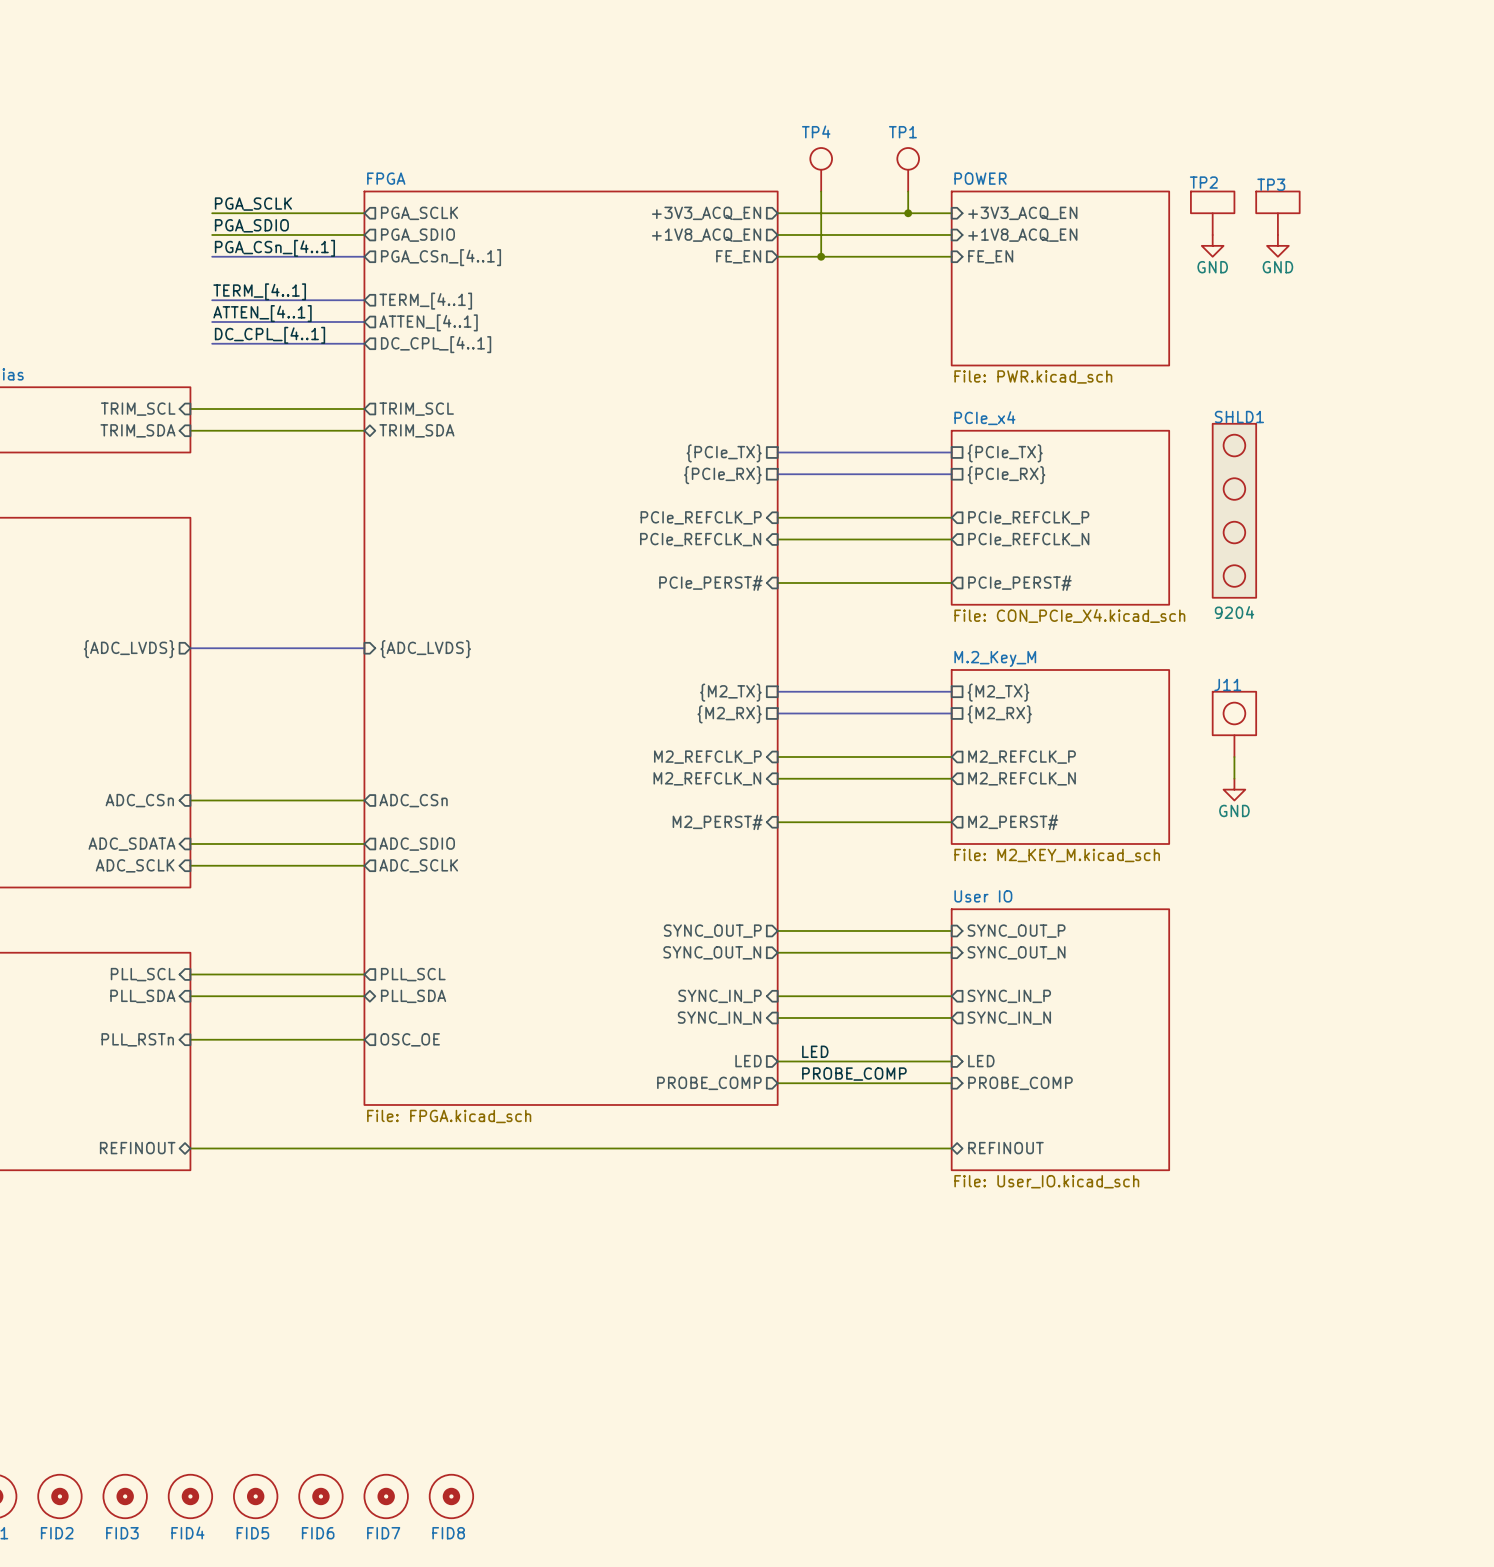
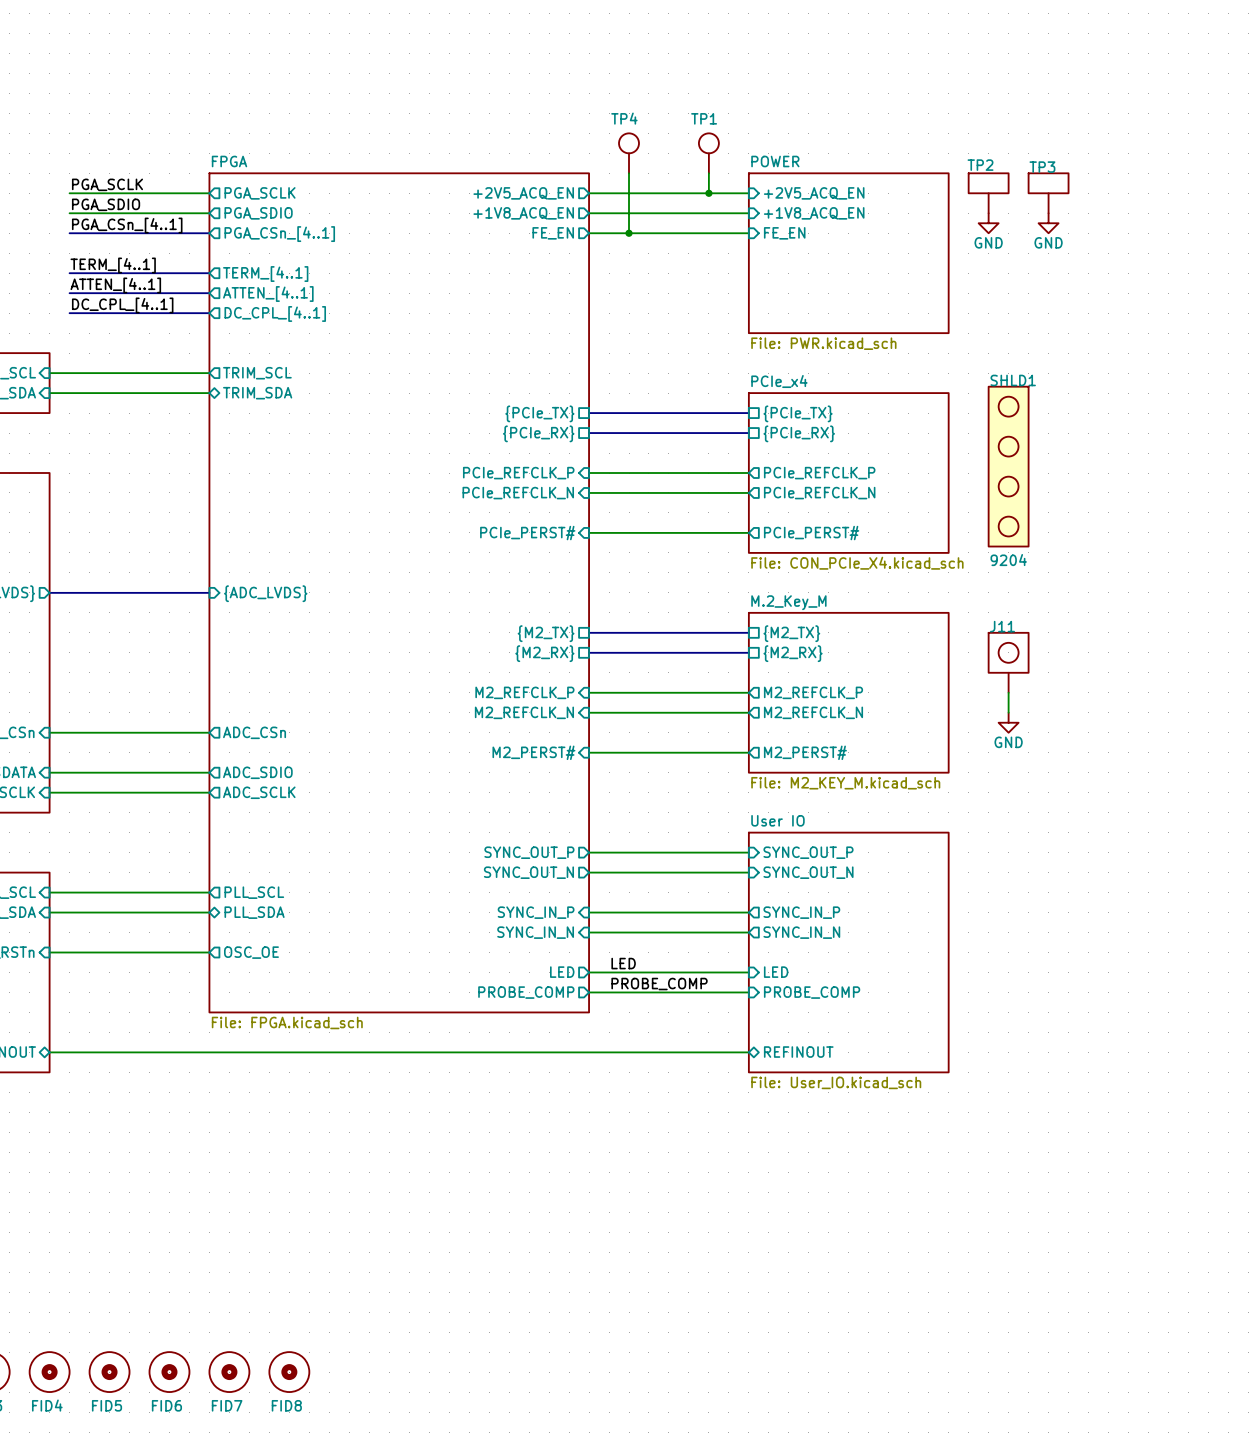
sheet pin: +3V3_ACQ_EN (706, 213) -> +2V5_ACQ_EN (523, 193)
sheet pin: +3V3_ACQ_EN (1022, 213) -> +2V5_ACQ_EN (814, 193)

